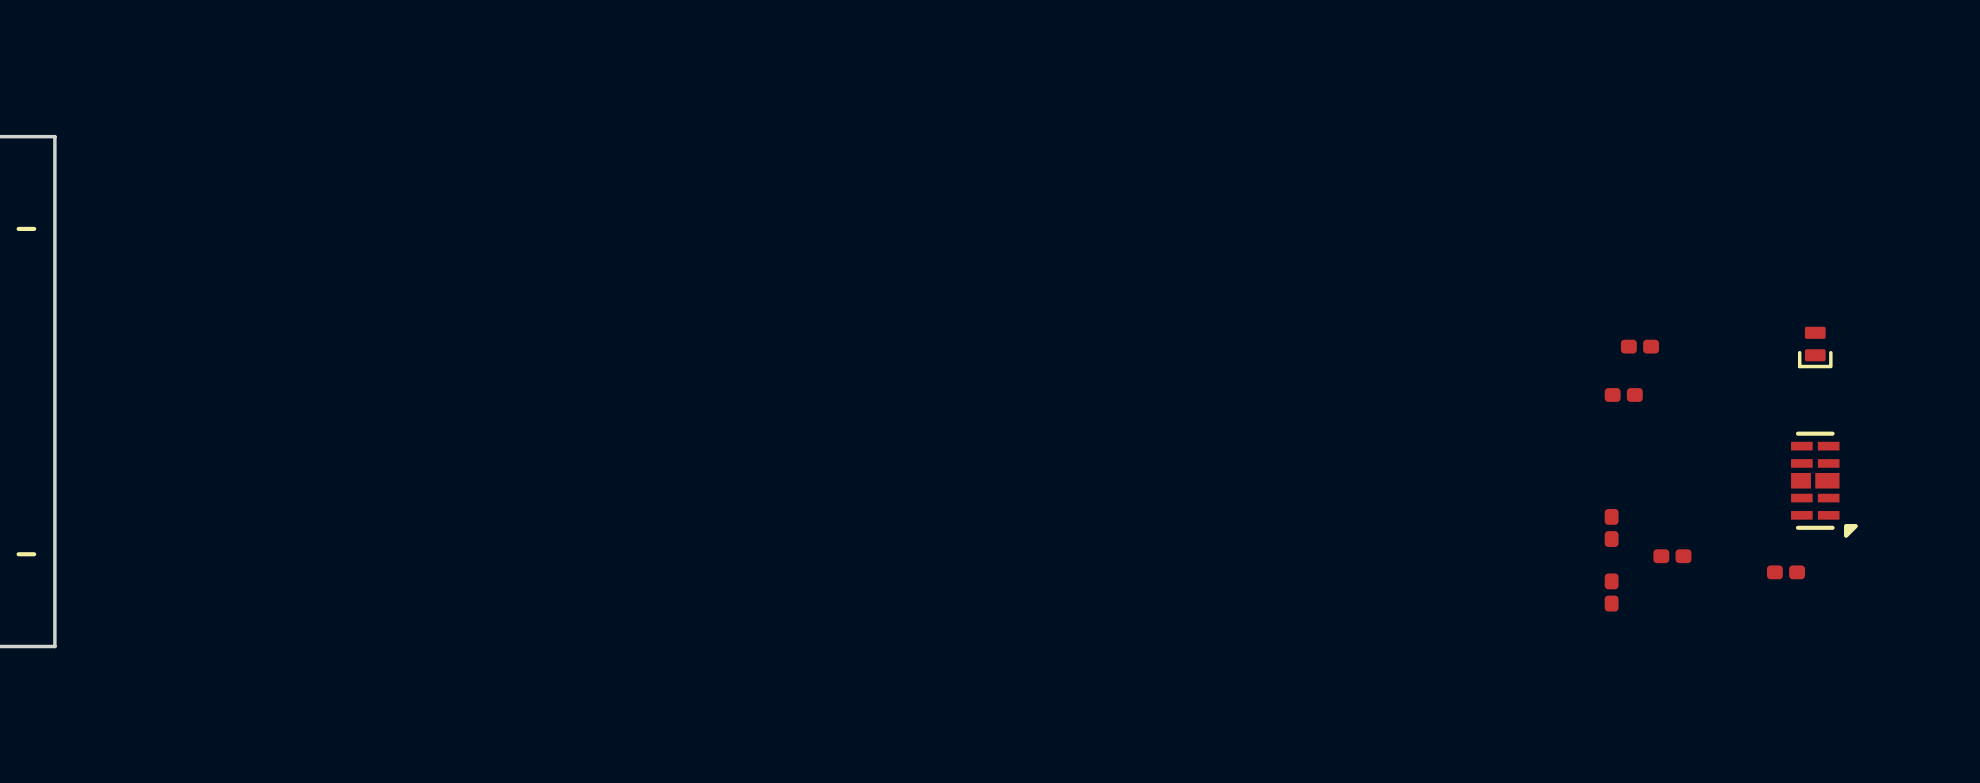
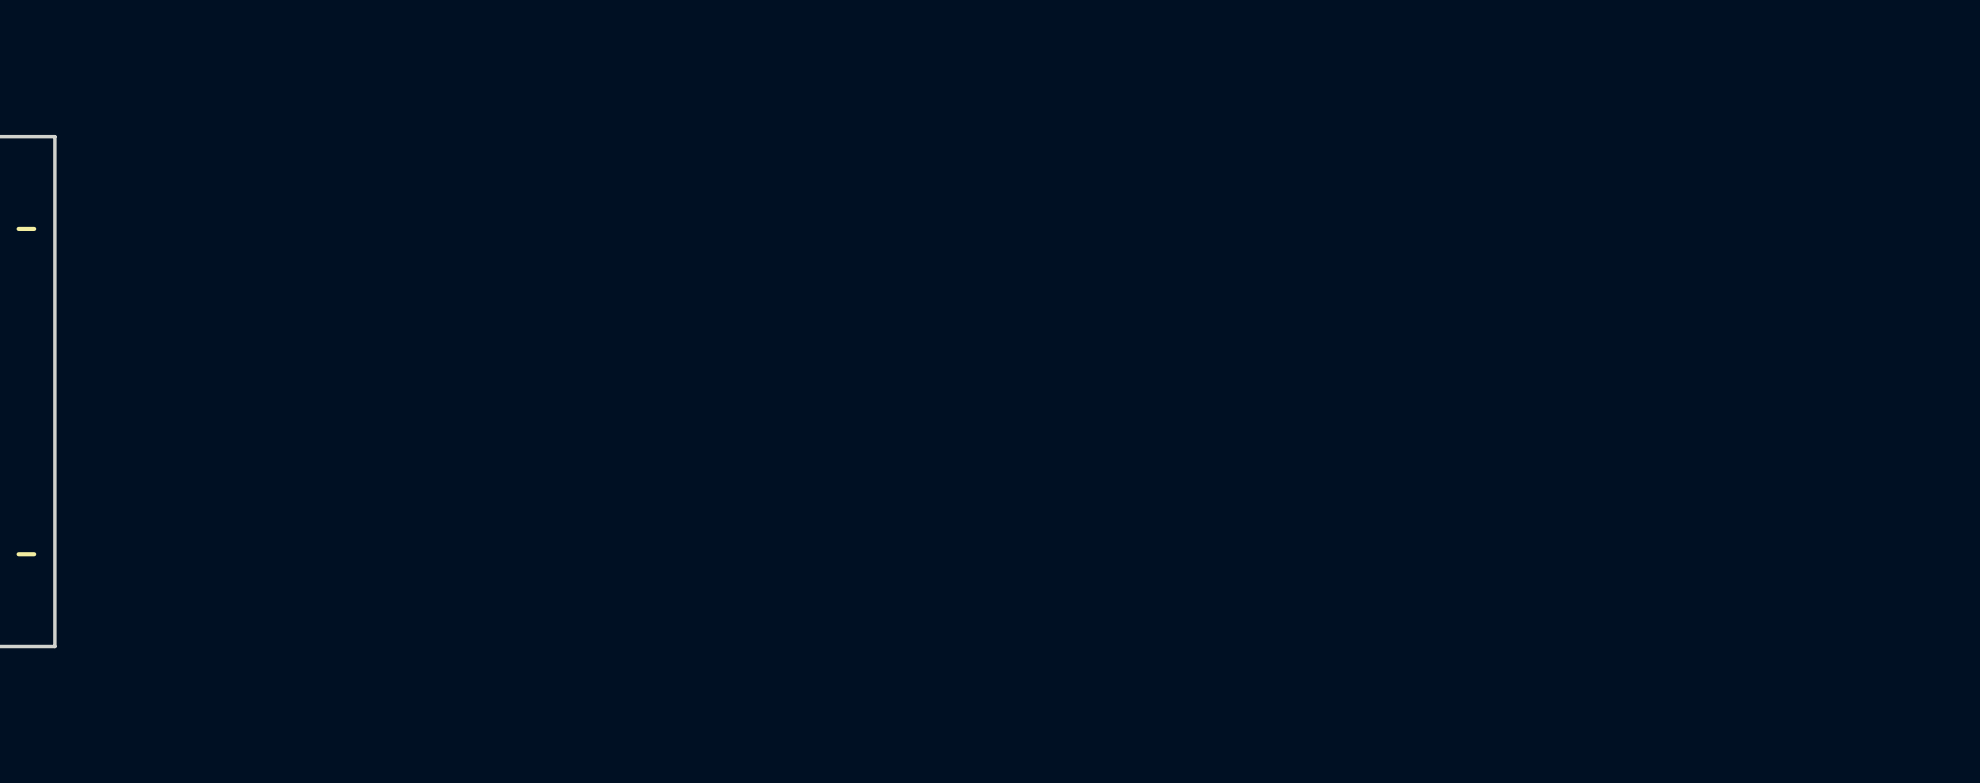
part: (1639, 346) -> none
part: (1815, 347) -> none
part: (1623, 394) -> none
part: (1824, 484) -> none
part: (1611, 527) -> none
part: (1672, 556) -> none
part: (1785, 572) -> none
part: (1611, 592) -> none

